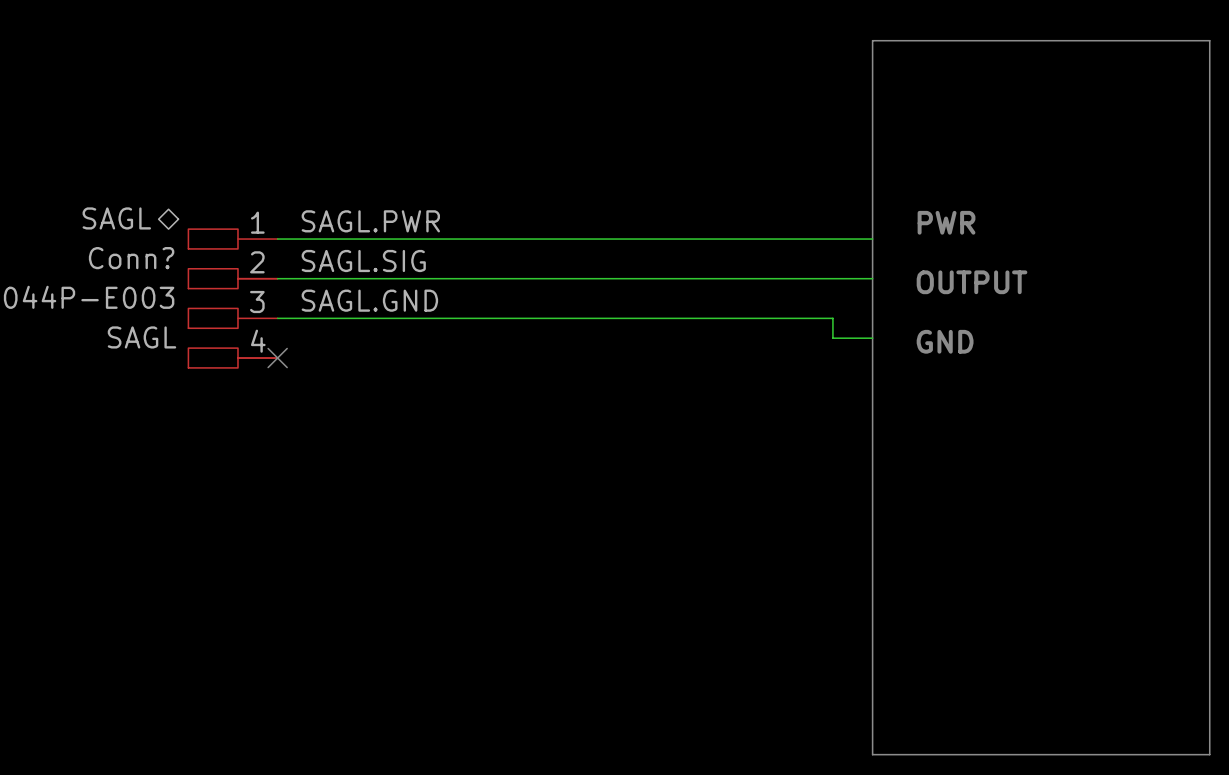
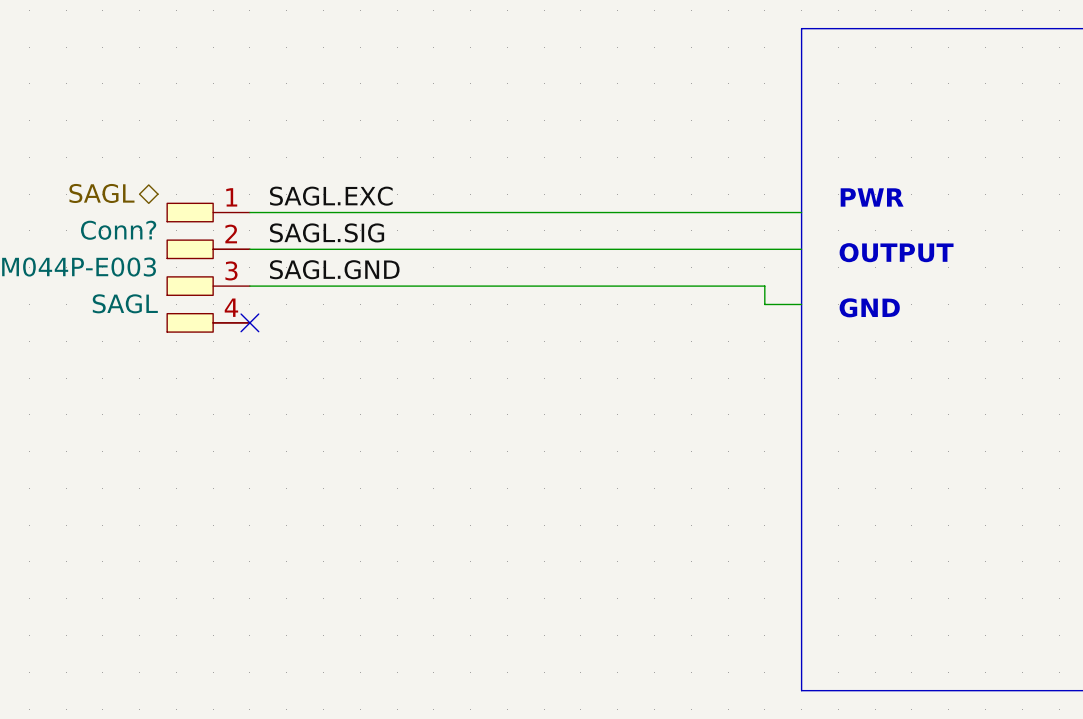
label: SAGL.PWR (370, 221) -> SAGL.EXC (331, 196)

